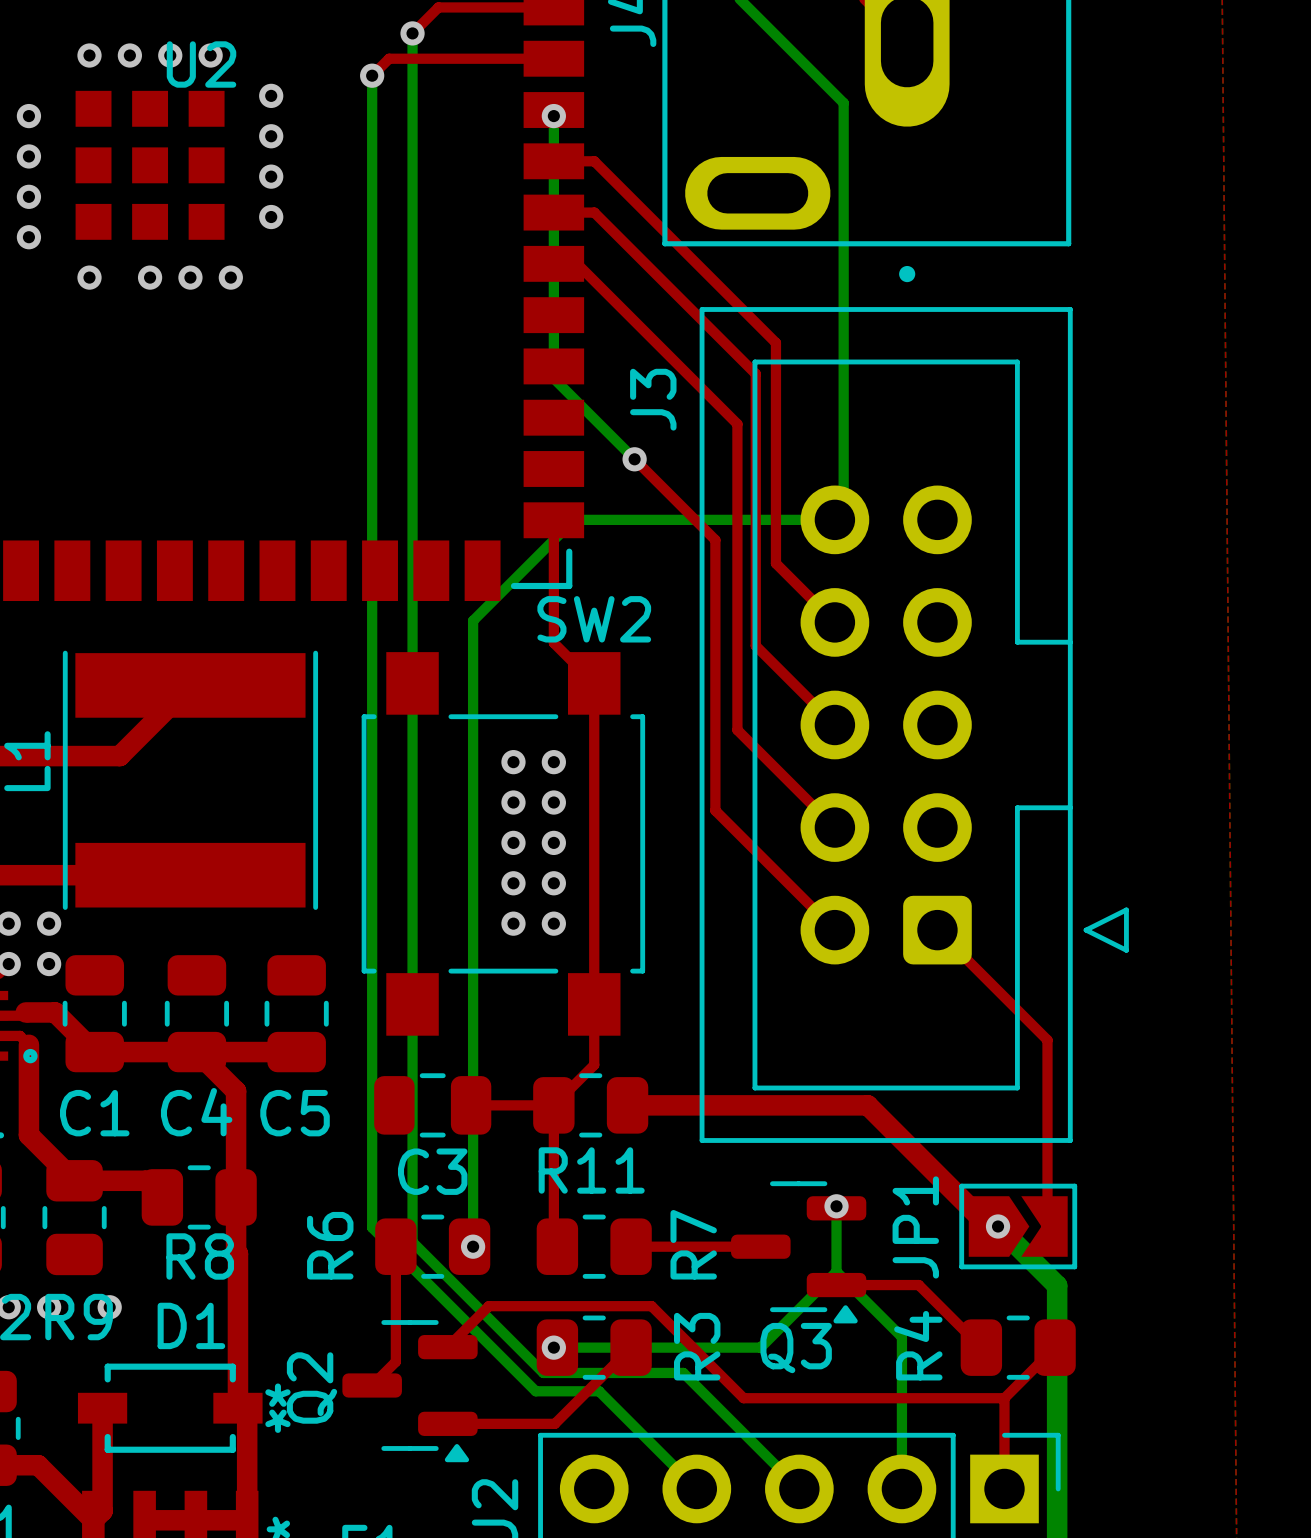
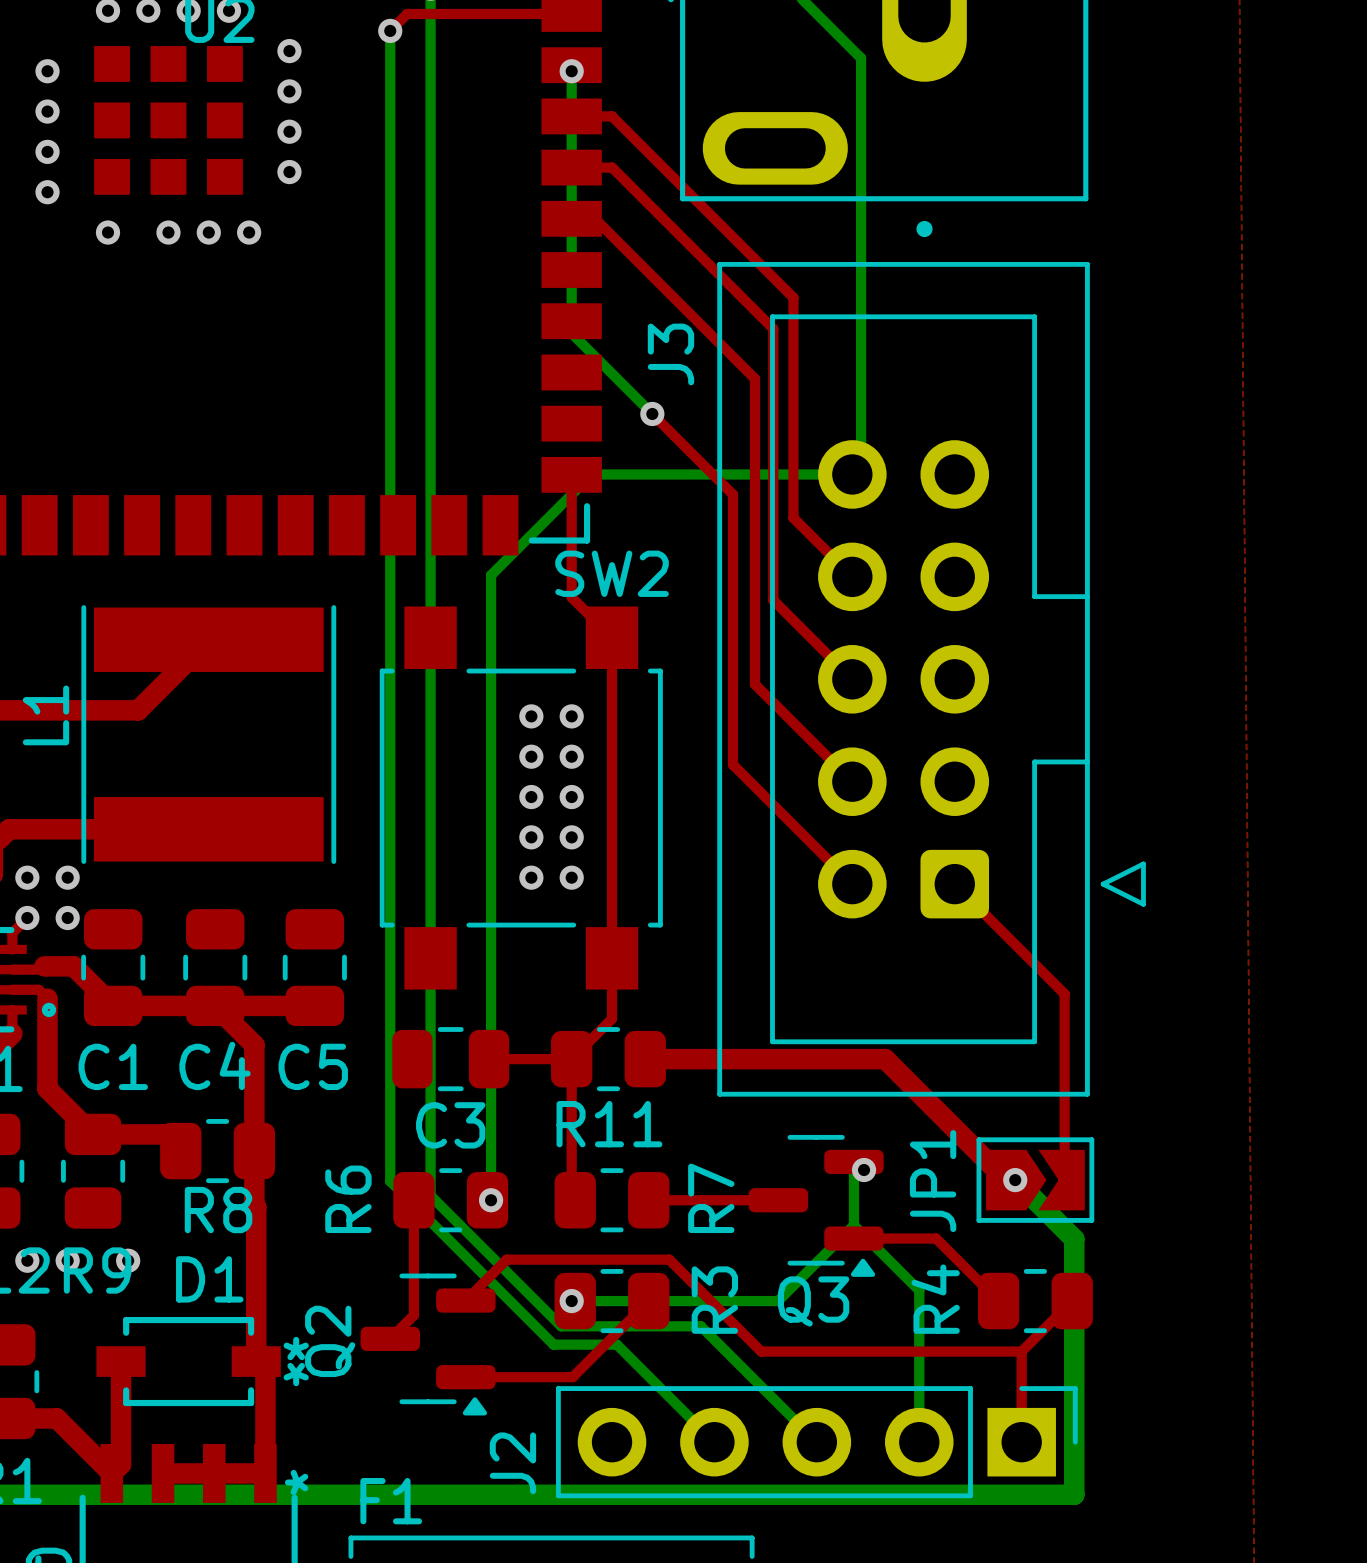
via position: (836, 1206) -> (864, 1170)

